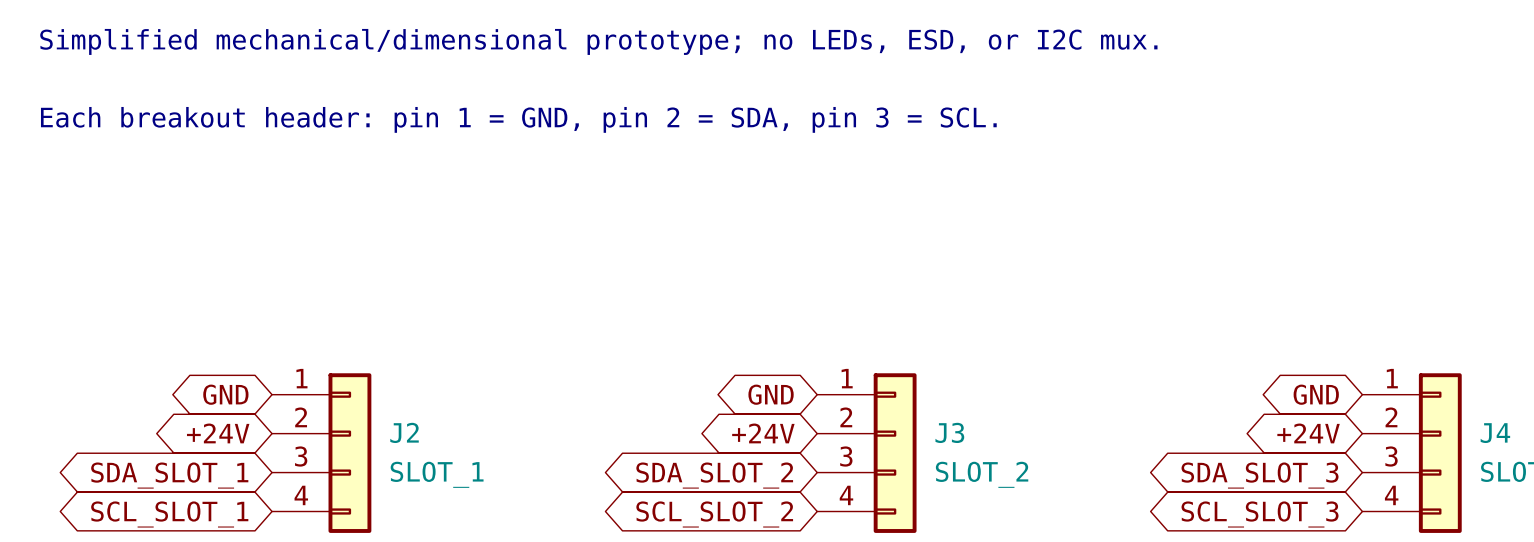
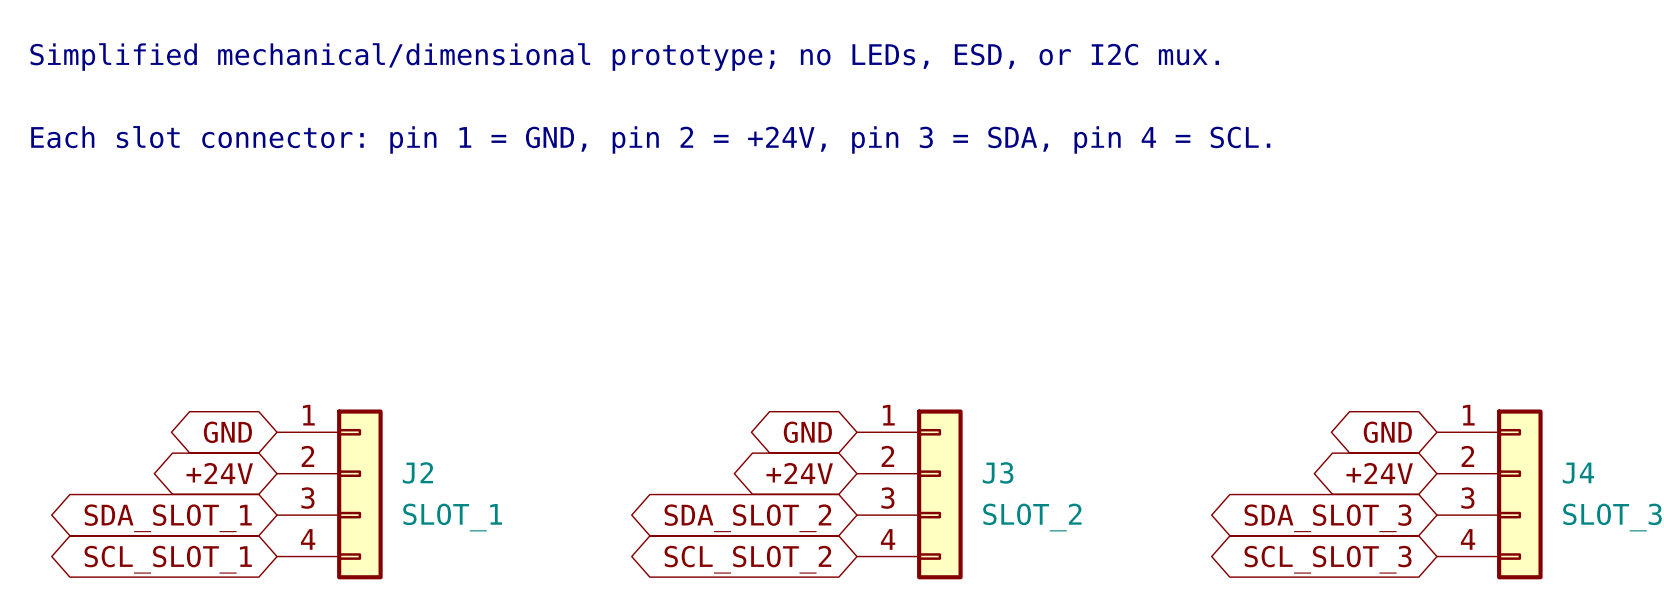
text: Each breakout header: pin 1 = GND, pin 2 = SDA, pin 3 = SCL. (518, 119) -> Each slot connector: pin 1 = GND, pin 2 = +24V, pin 3 = SDA, pin 4 = SCL. (650, 139)

